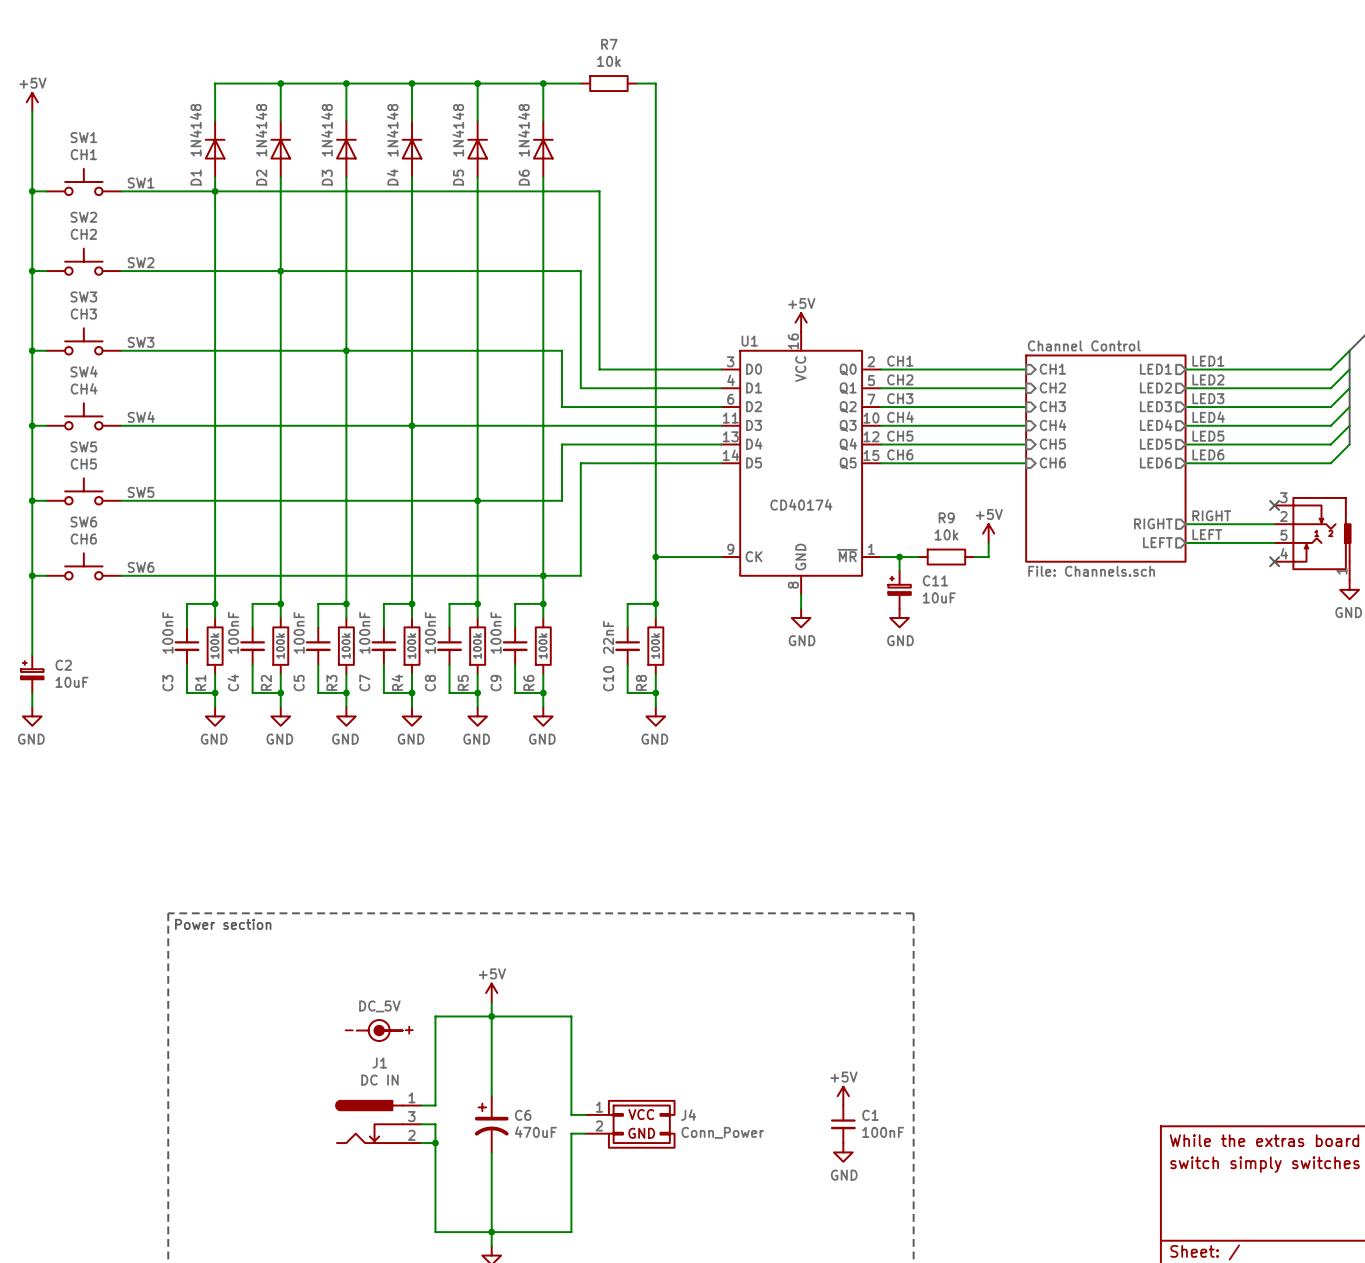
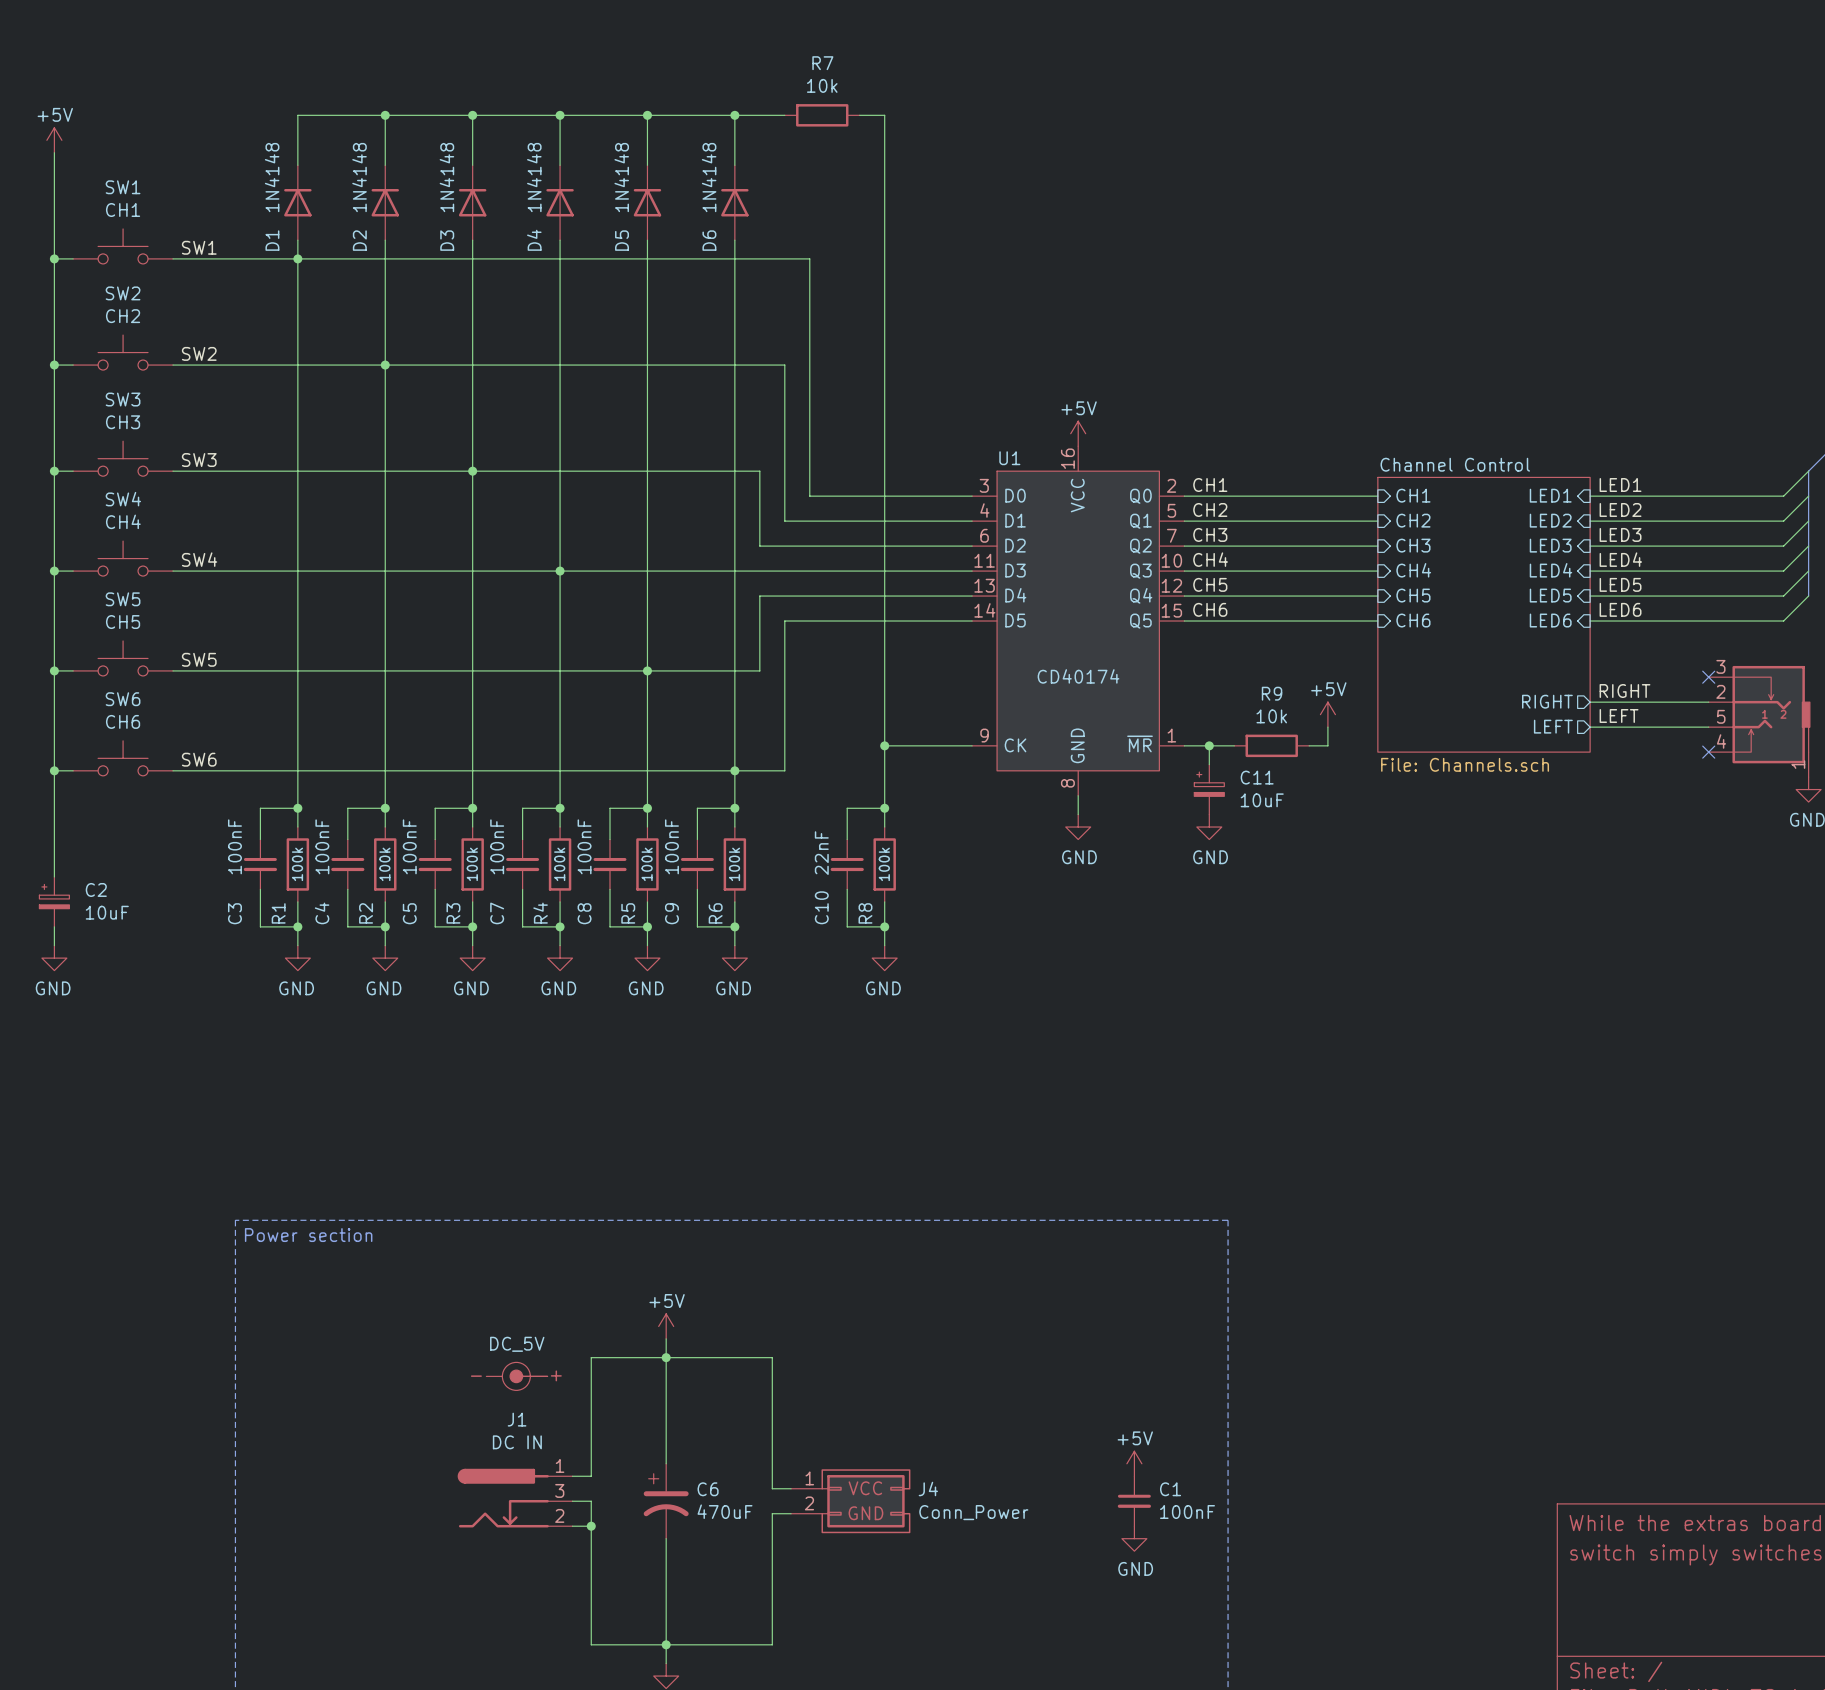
sheet pin shape: output (1155, 369) -> input (1550, 495)
sheet pin shape: output (1155, 387) -> input (1550, 520)
sheet pin shape: output (1155, 406) -> input (1550, 545)
sheet pin shape: output (1156, 425) -> input (1550, 570)
sheet pin shape: output (1155, 444) -> input (1550, 595)
sheet pin shape: output (1155, 462) -> input (1550, 620)

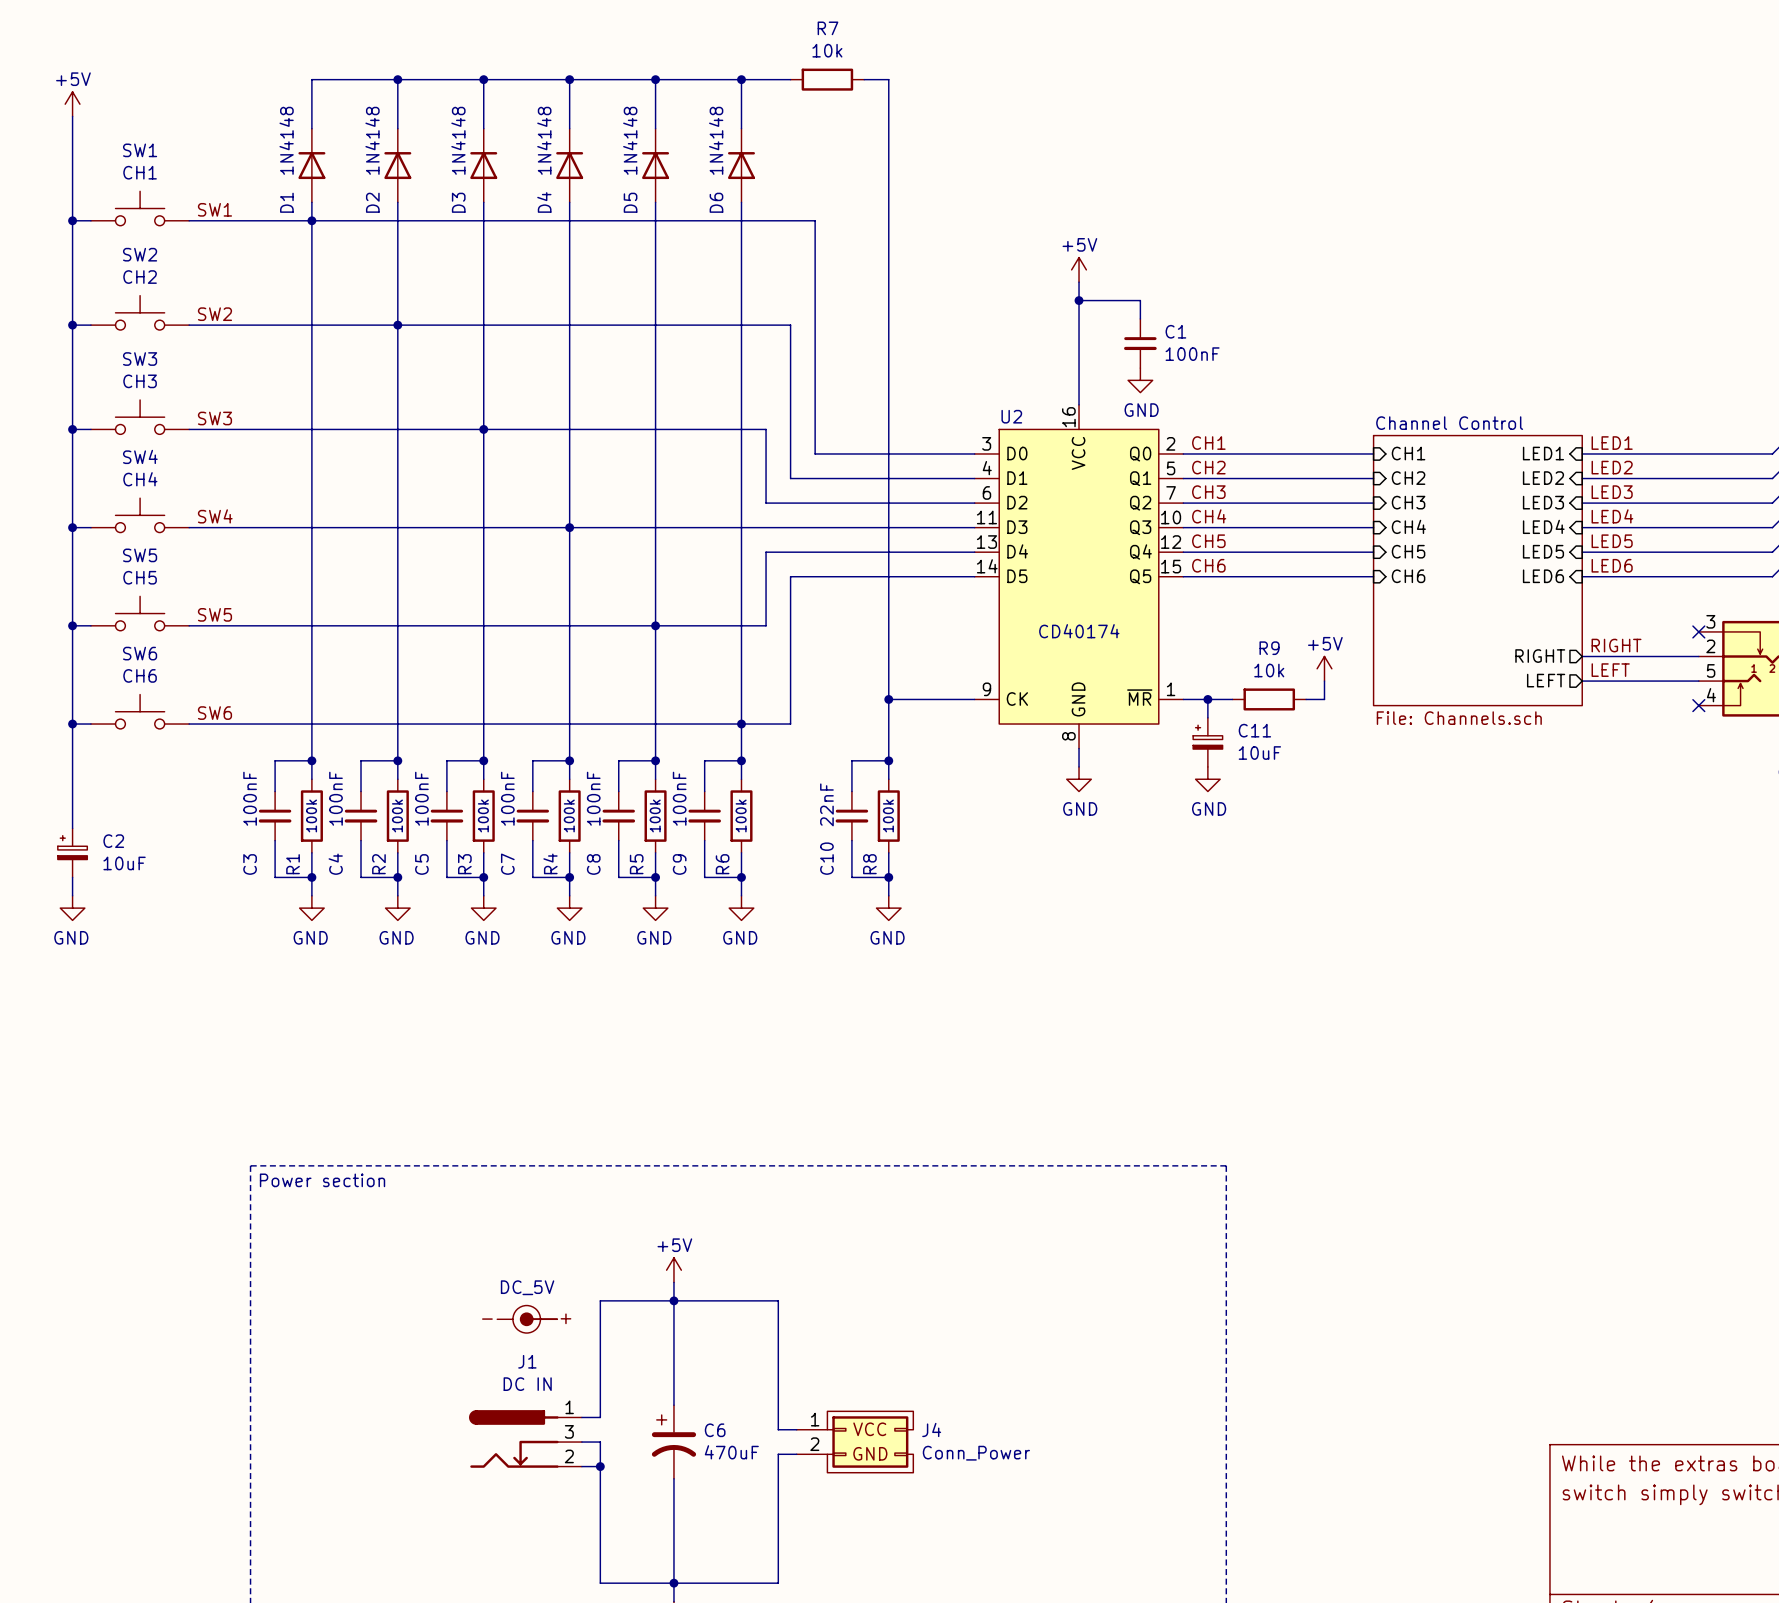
wire: none -> (1079, 282) (1079, 404)
wire: none -> (1079, 300) (1140, 300) (1140, 318)
junction: none -> (1079, 300)
power symbol: none -> GND (1140, 380)
power symbol position: +5V (1078, 433) -> +5V (1079, 269)
U1 name: U1 (1009, 458) -> U2 (1011, 416)
power symbol: +5V (1134, 1463) -> none
C1 position: (1134, 1501) -> (1140, 343)
power symbol: GND (1134, 1538) -> none

